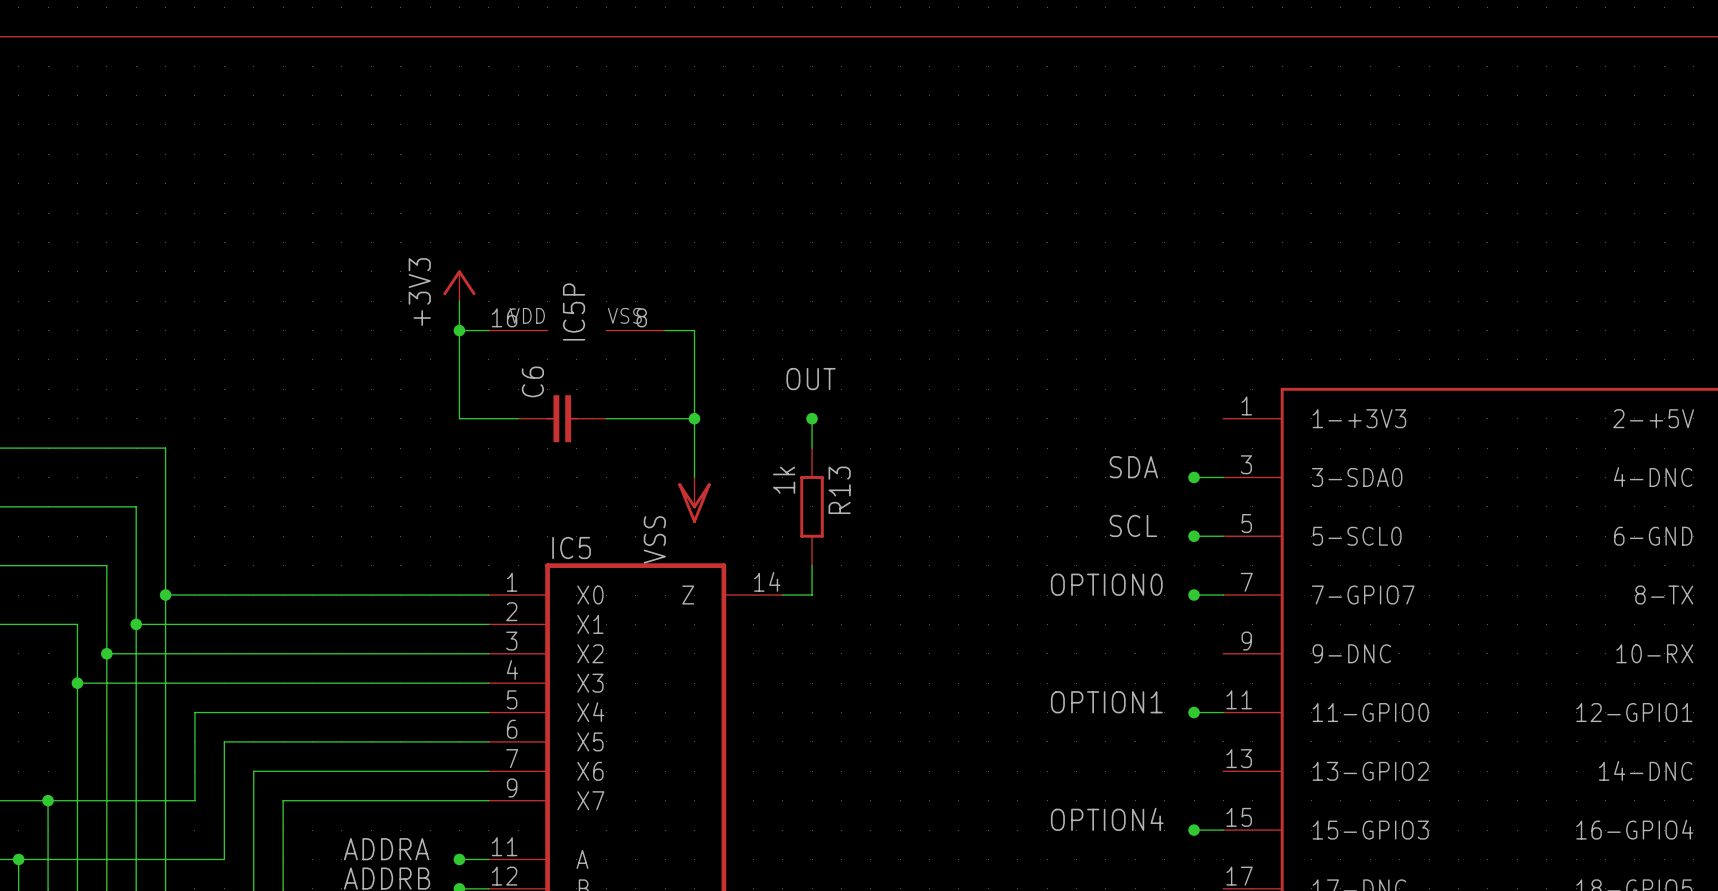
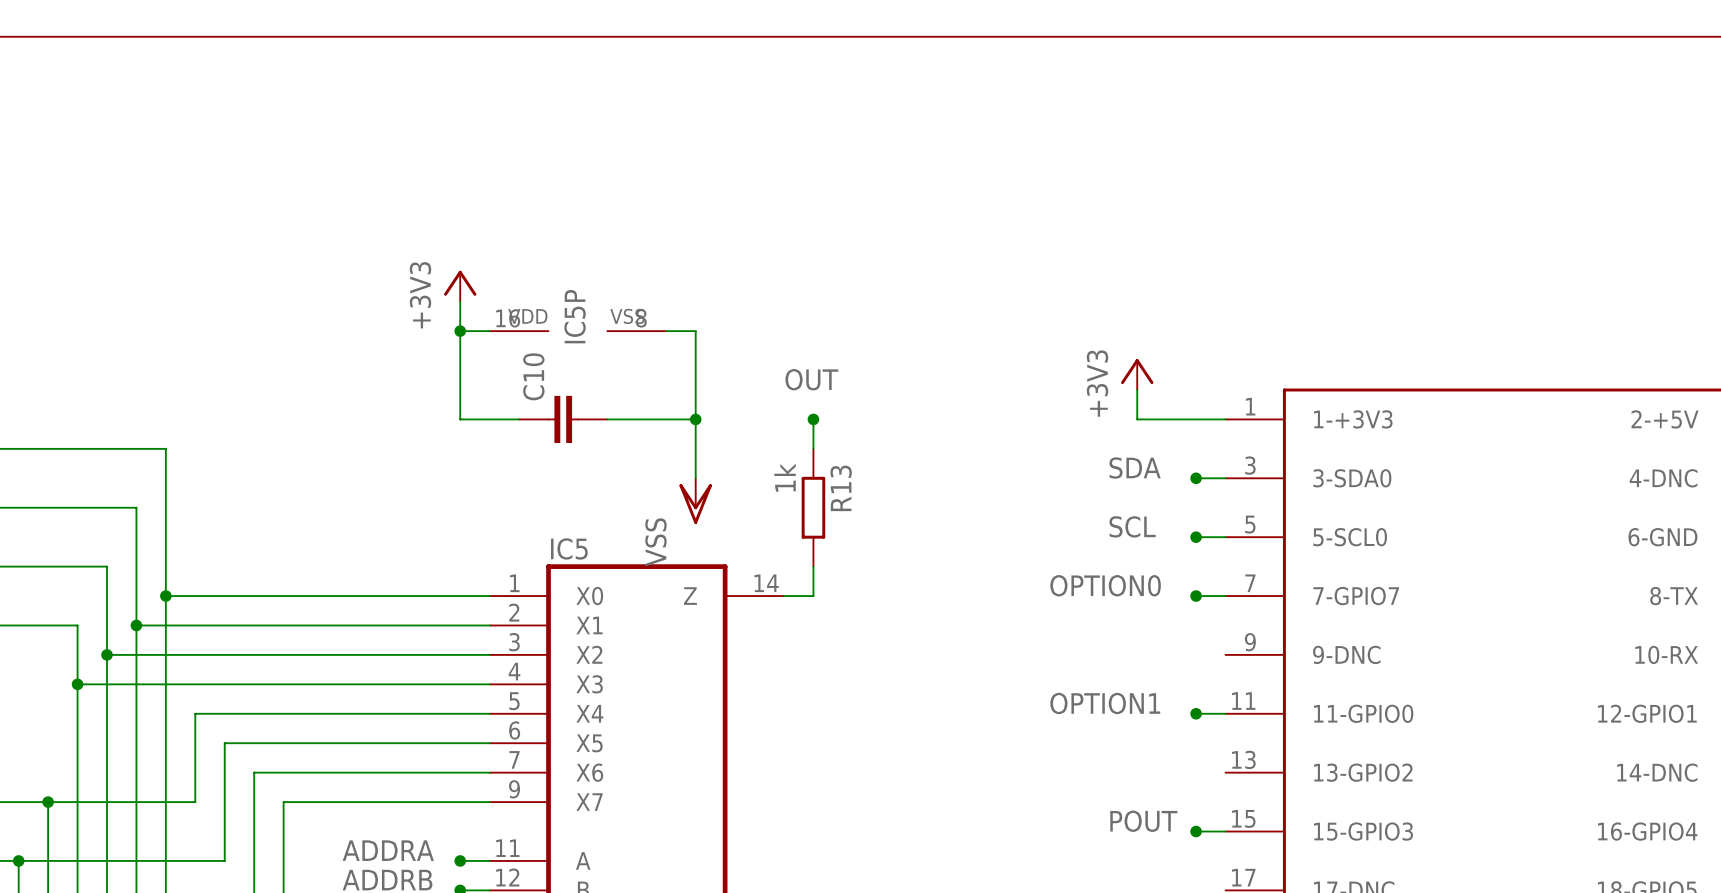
power symbol: none -> +3V3 (1137, 374)
C6 name: C6 (532, 381) -> C10 (533, 376)
wire: none -> (1137, 390) (1137, 419) (1225, 419)
label: OPTION4 (1107, 819) -> none
label: none -> POUT (1143, 821)

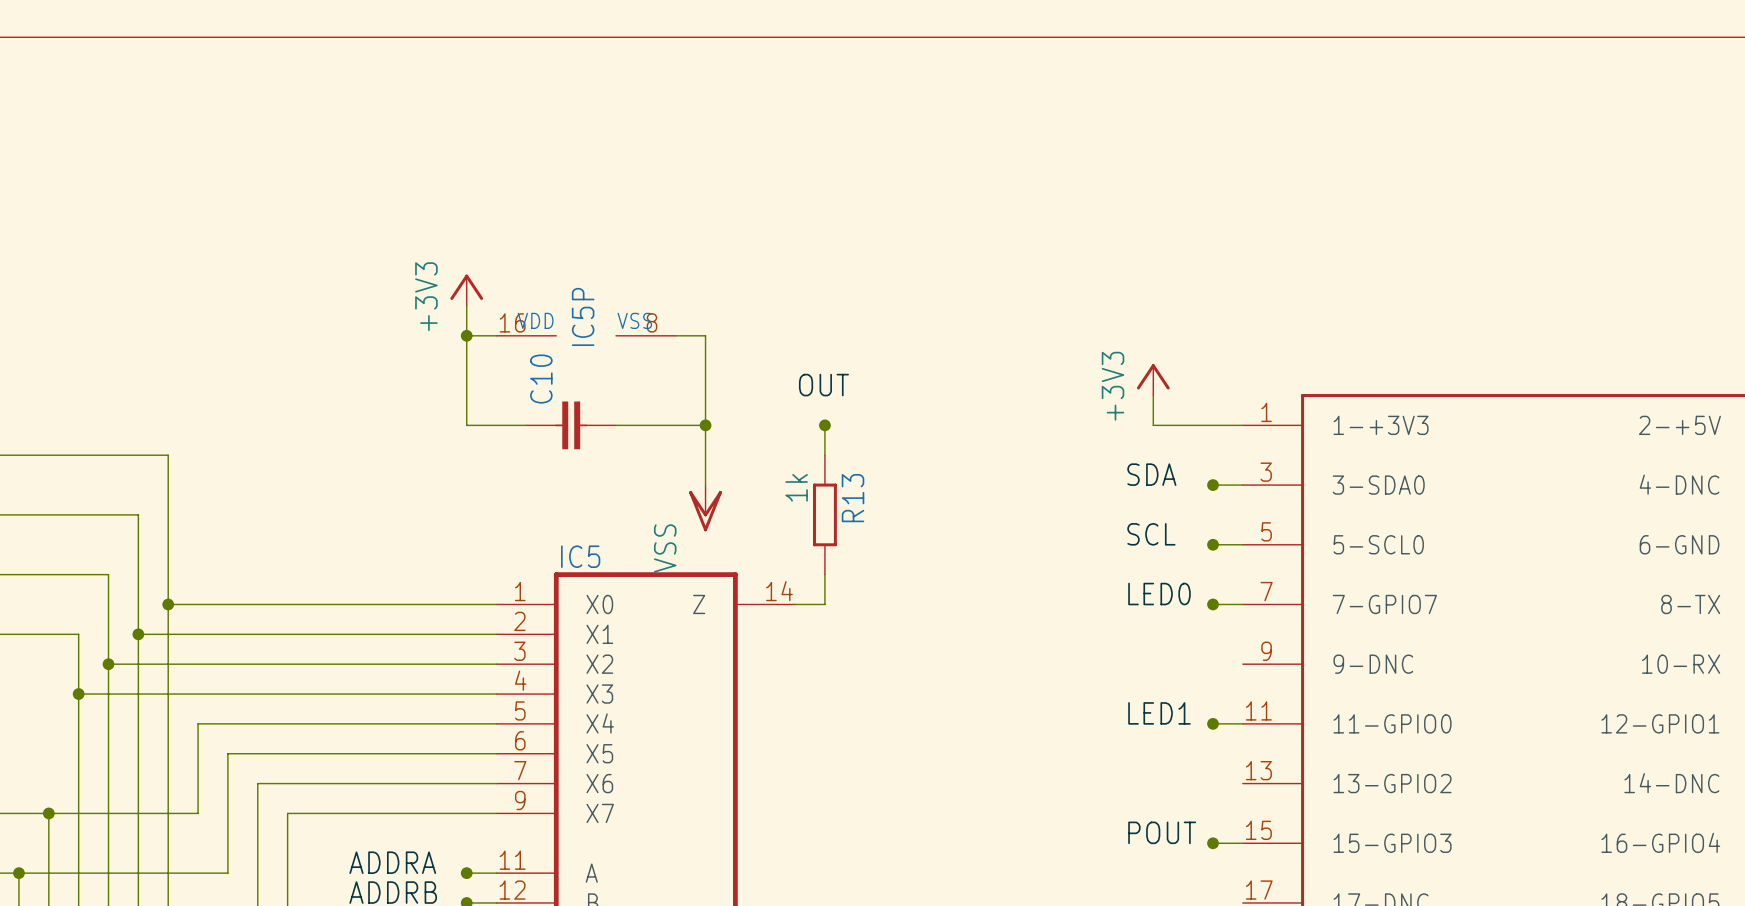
label: OPTION0 (1105, 585) -> none
label: none -> LED0 (1159, 594)
label: OPTION1 (1105, 703) -> none
label: none -> LED1 (1159, 713)

